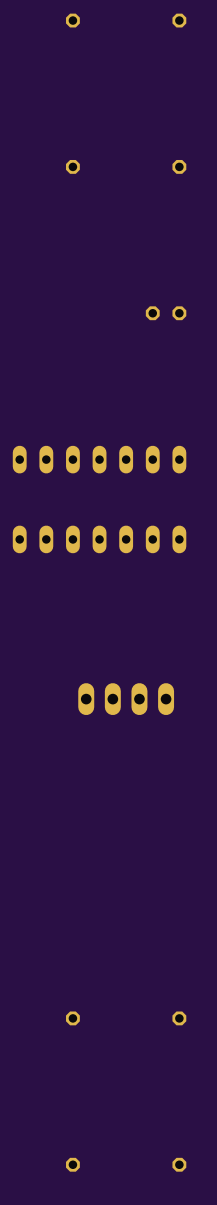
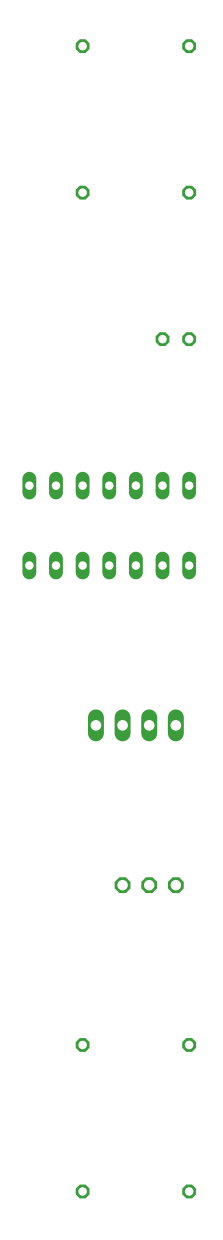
part: none -> (149, 885)

